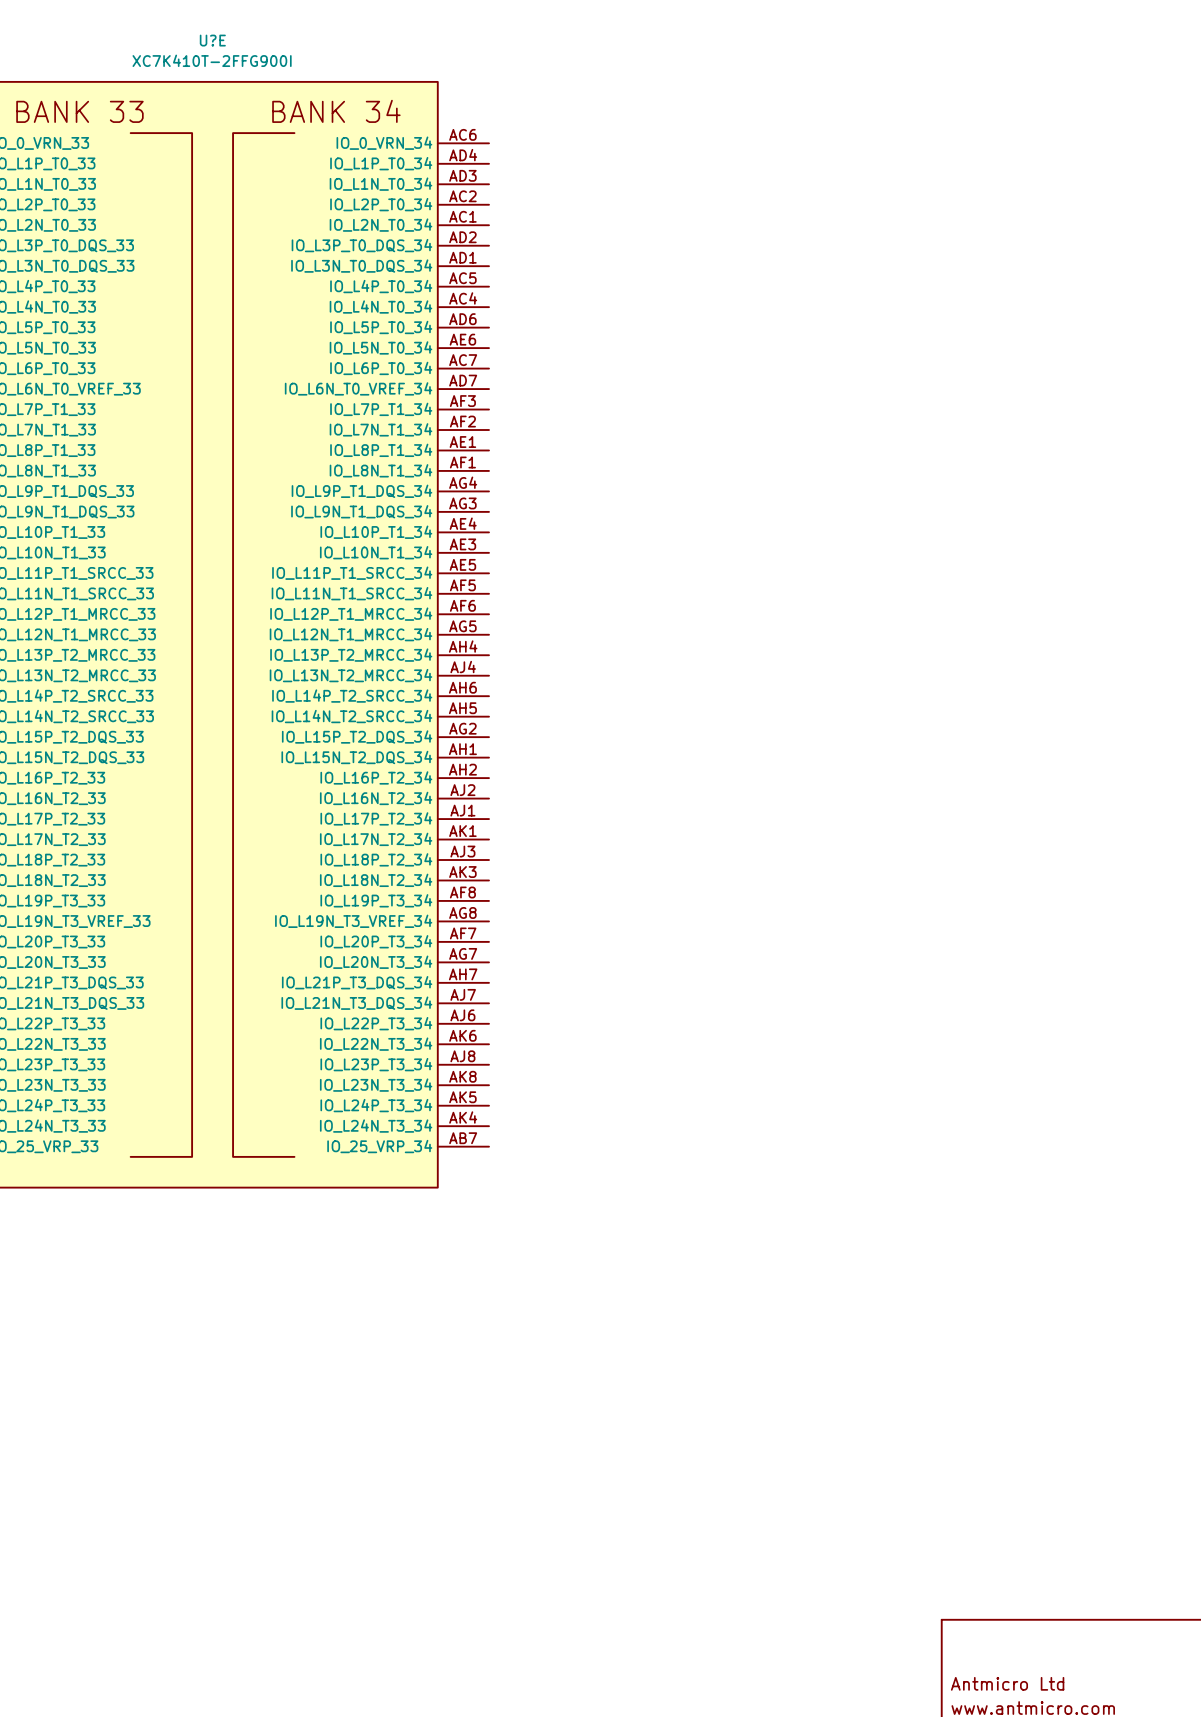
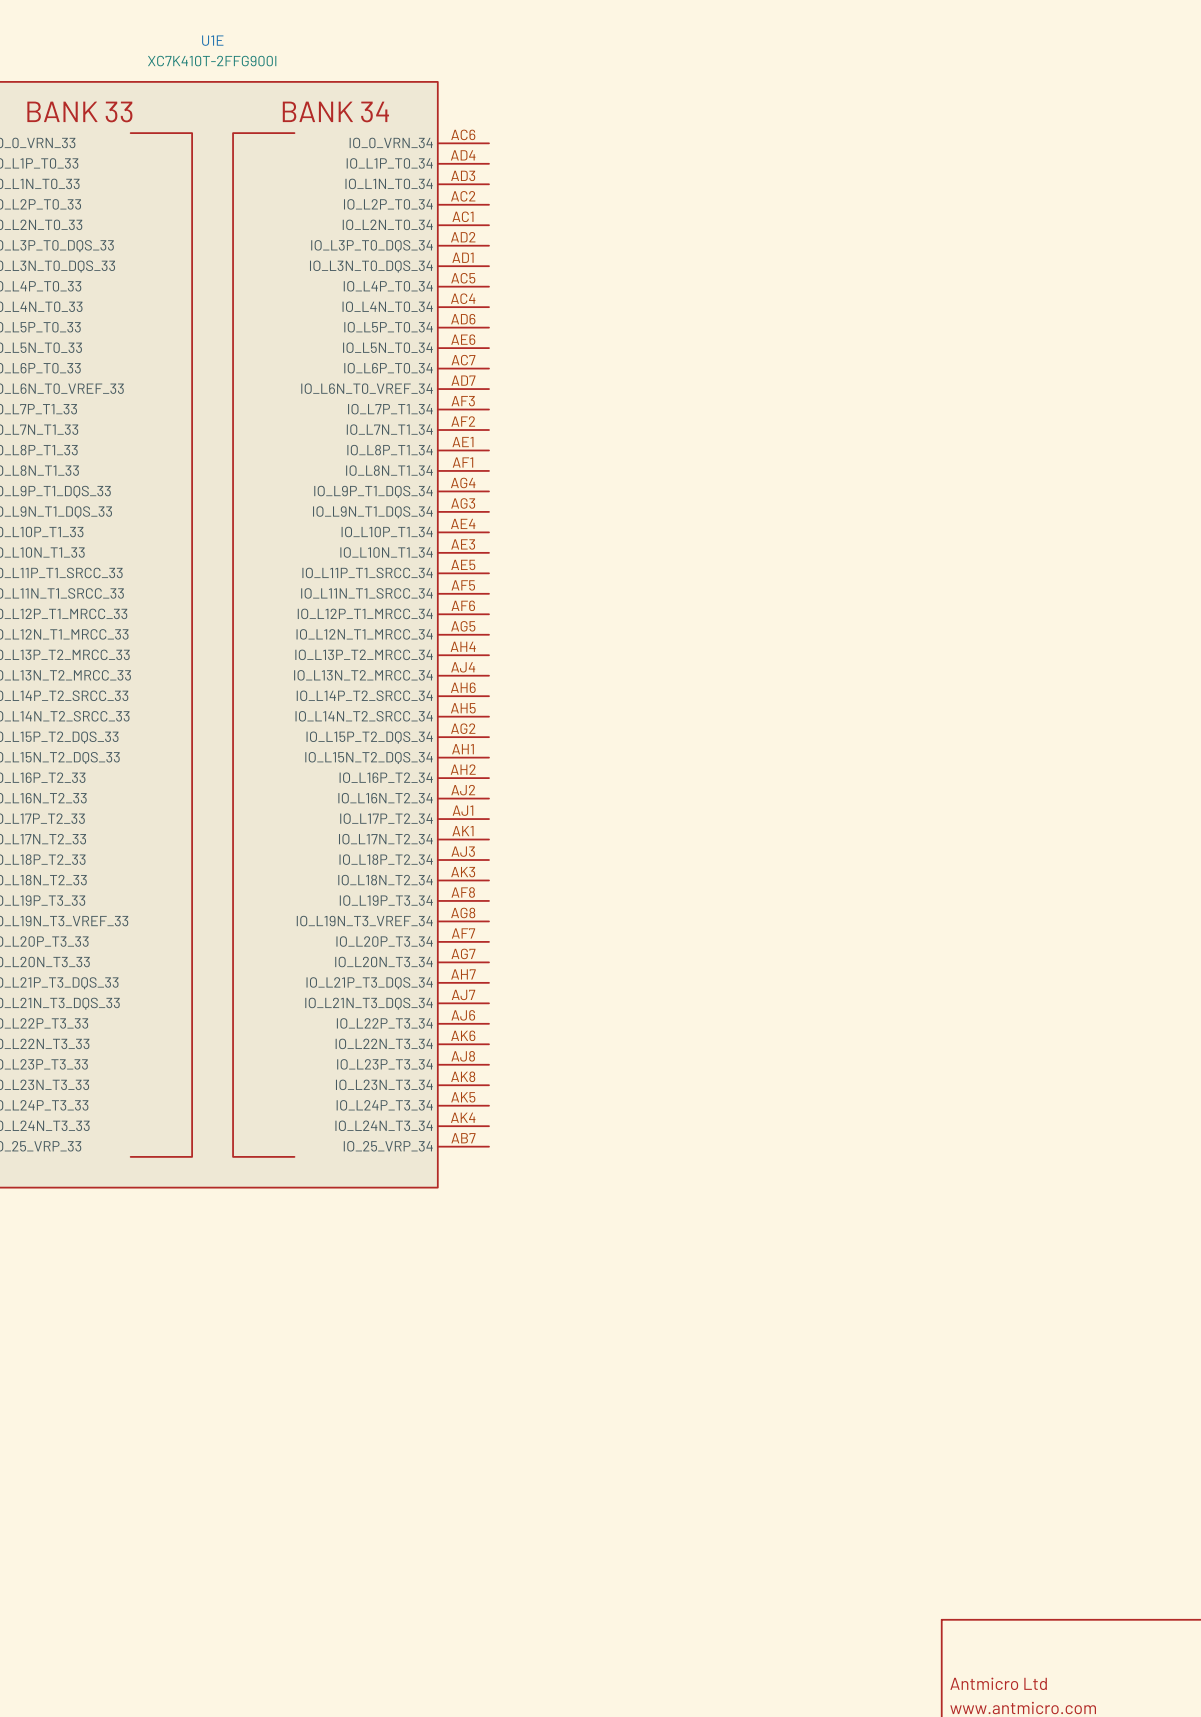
U?E name: U?E (212, 40) -> U1E (212, 40)

